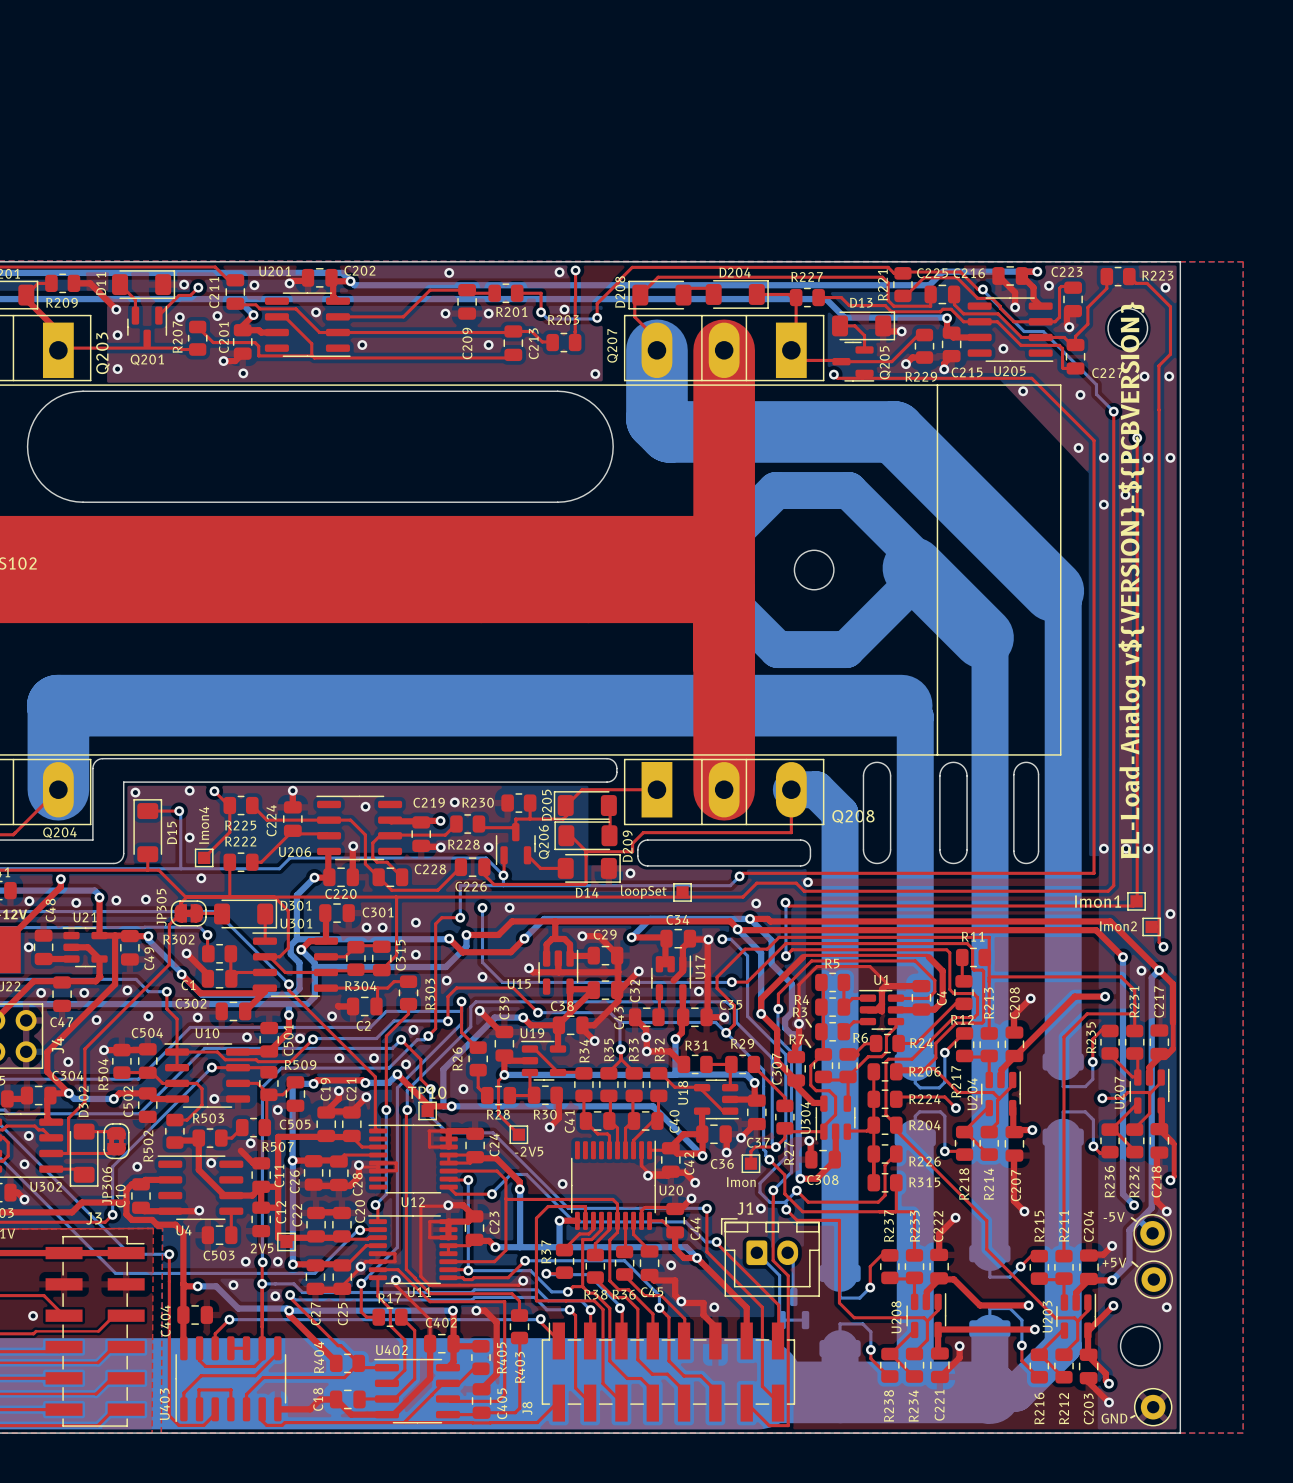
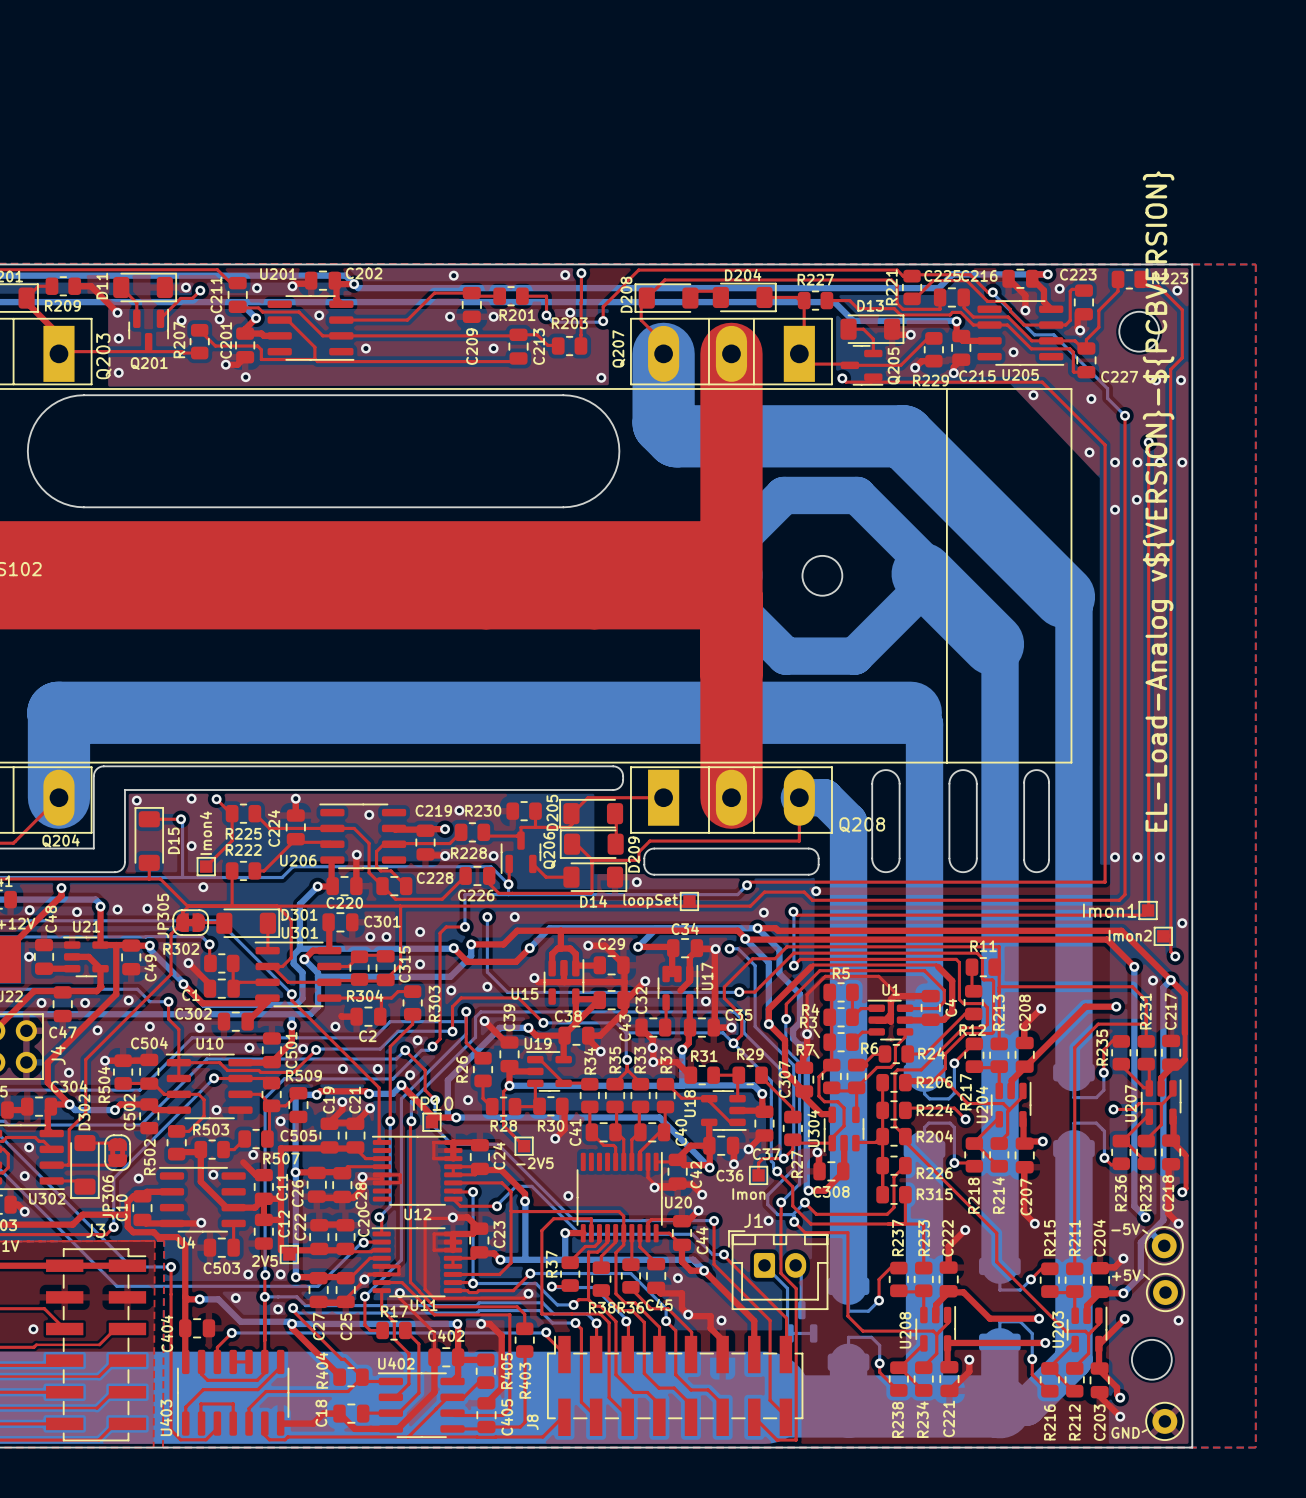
text position: EL-Load-Analog v${VERSION}-${PCBVERSION} (1131, 580) -> EL-Load-Analog v${VERSION}-${PCBVERSION} (1158, 501)

